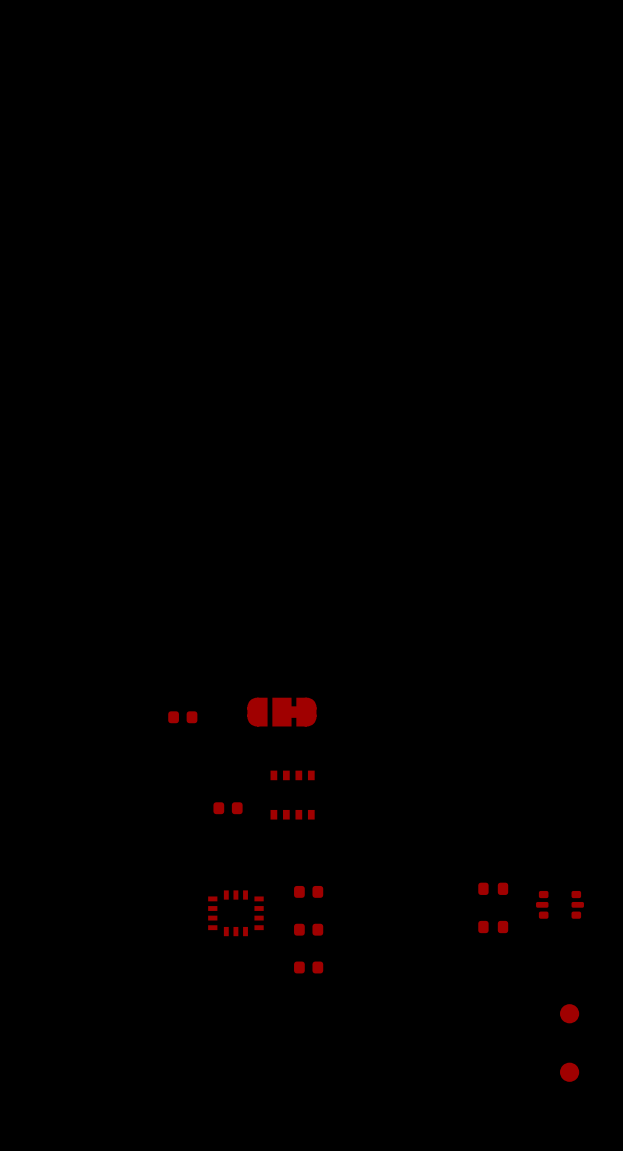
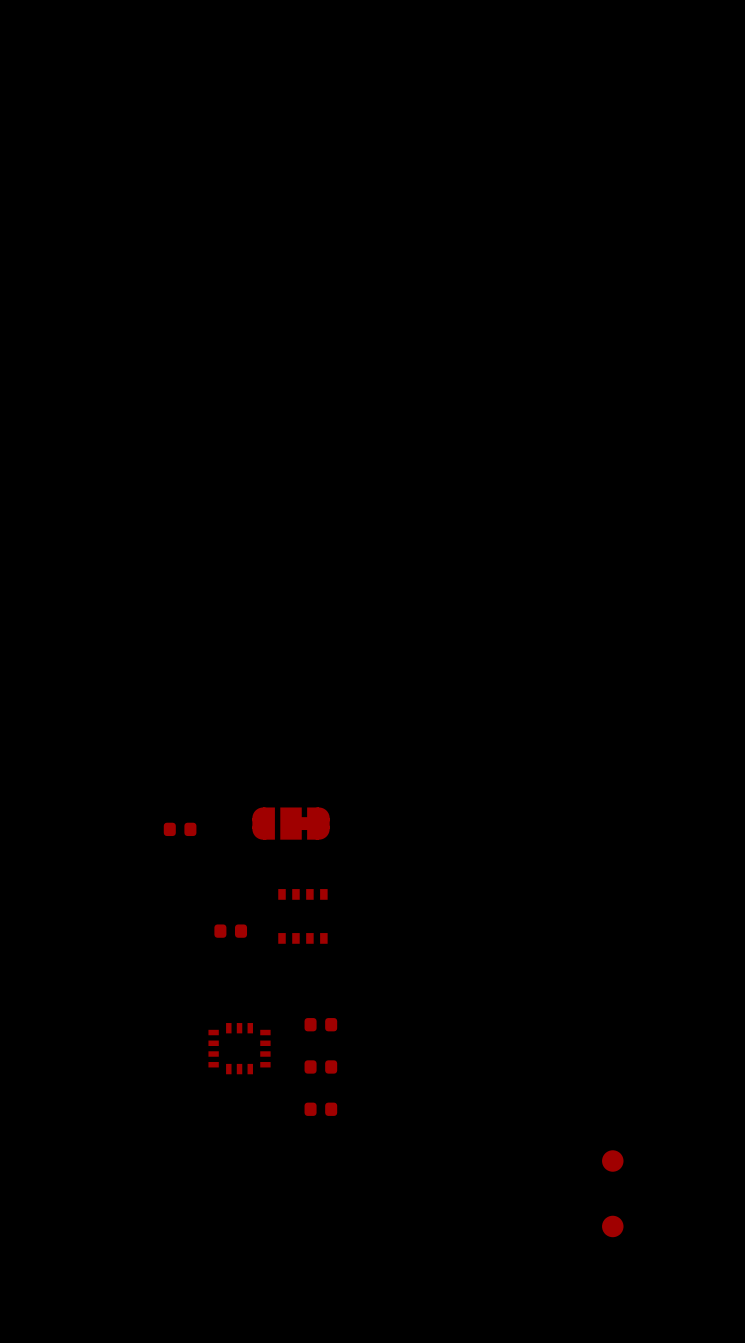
part: (493, 888) -> none
part: (559, 904) -> none
part: (493, 927) -> none

